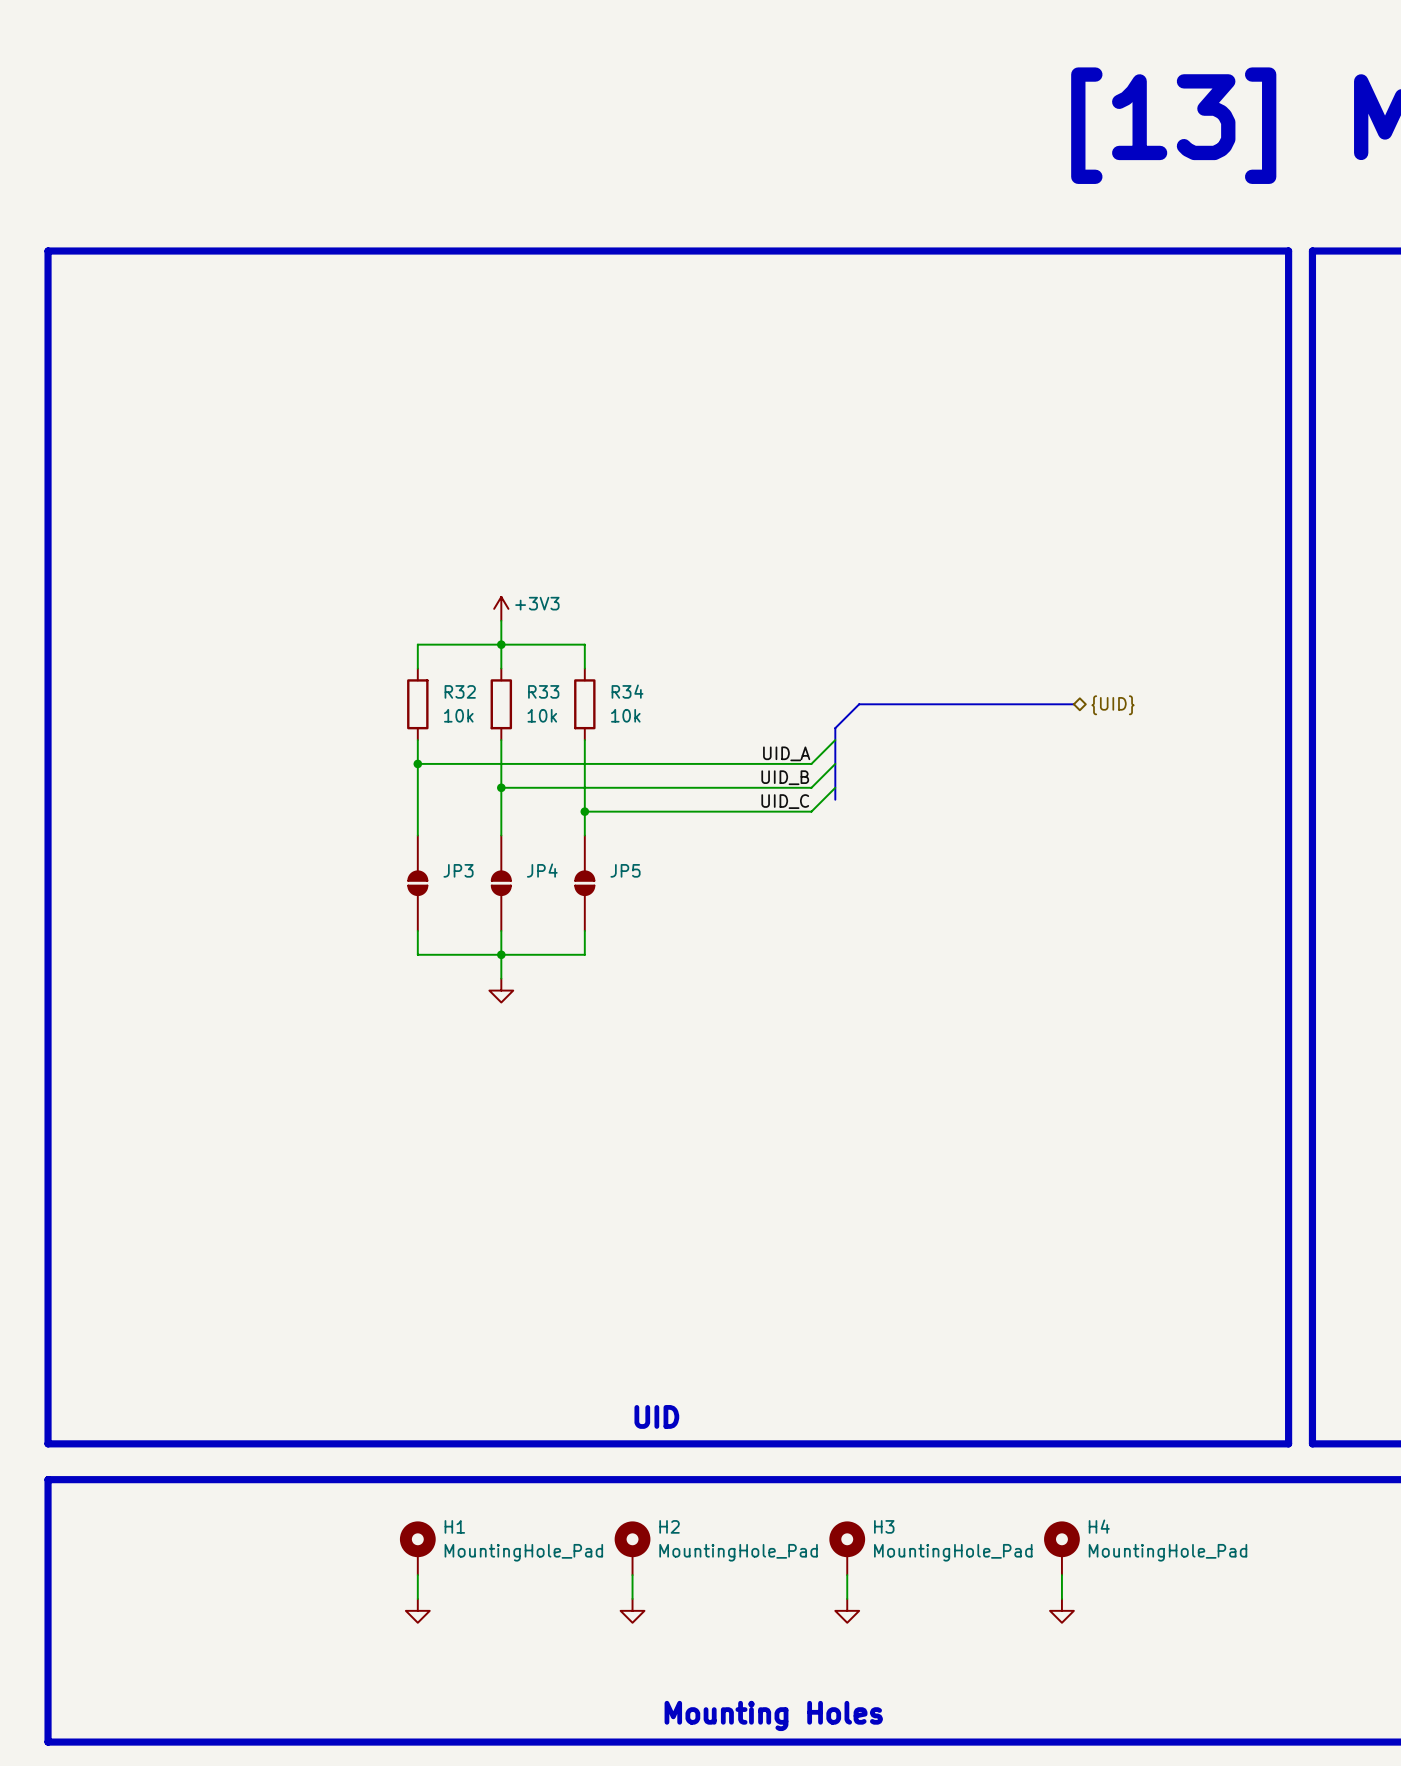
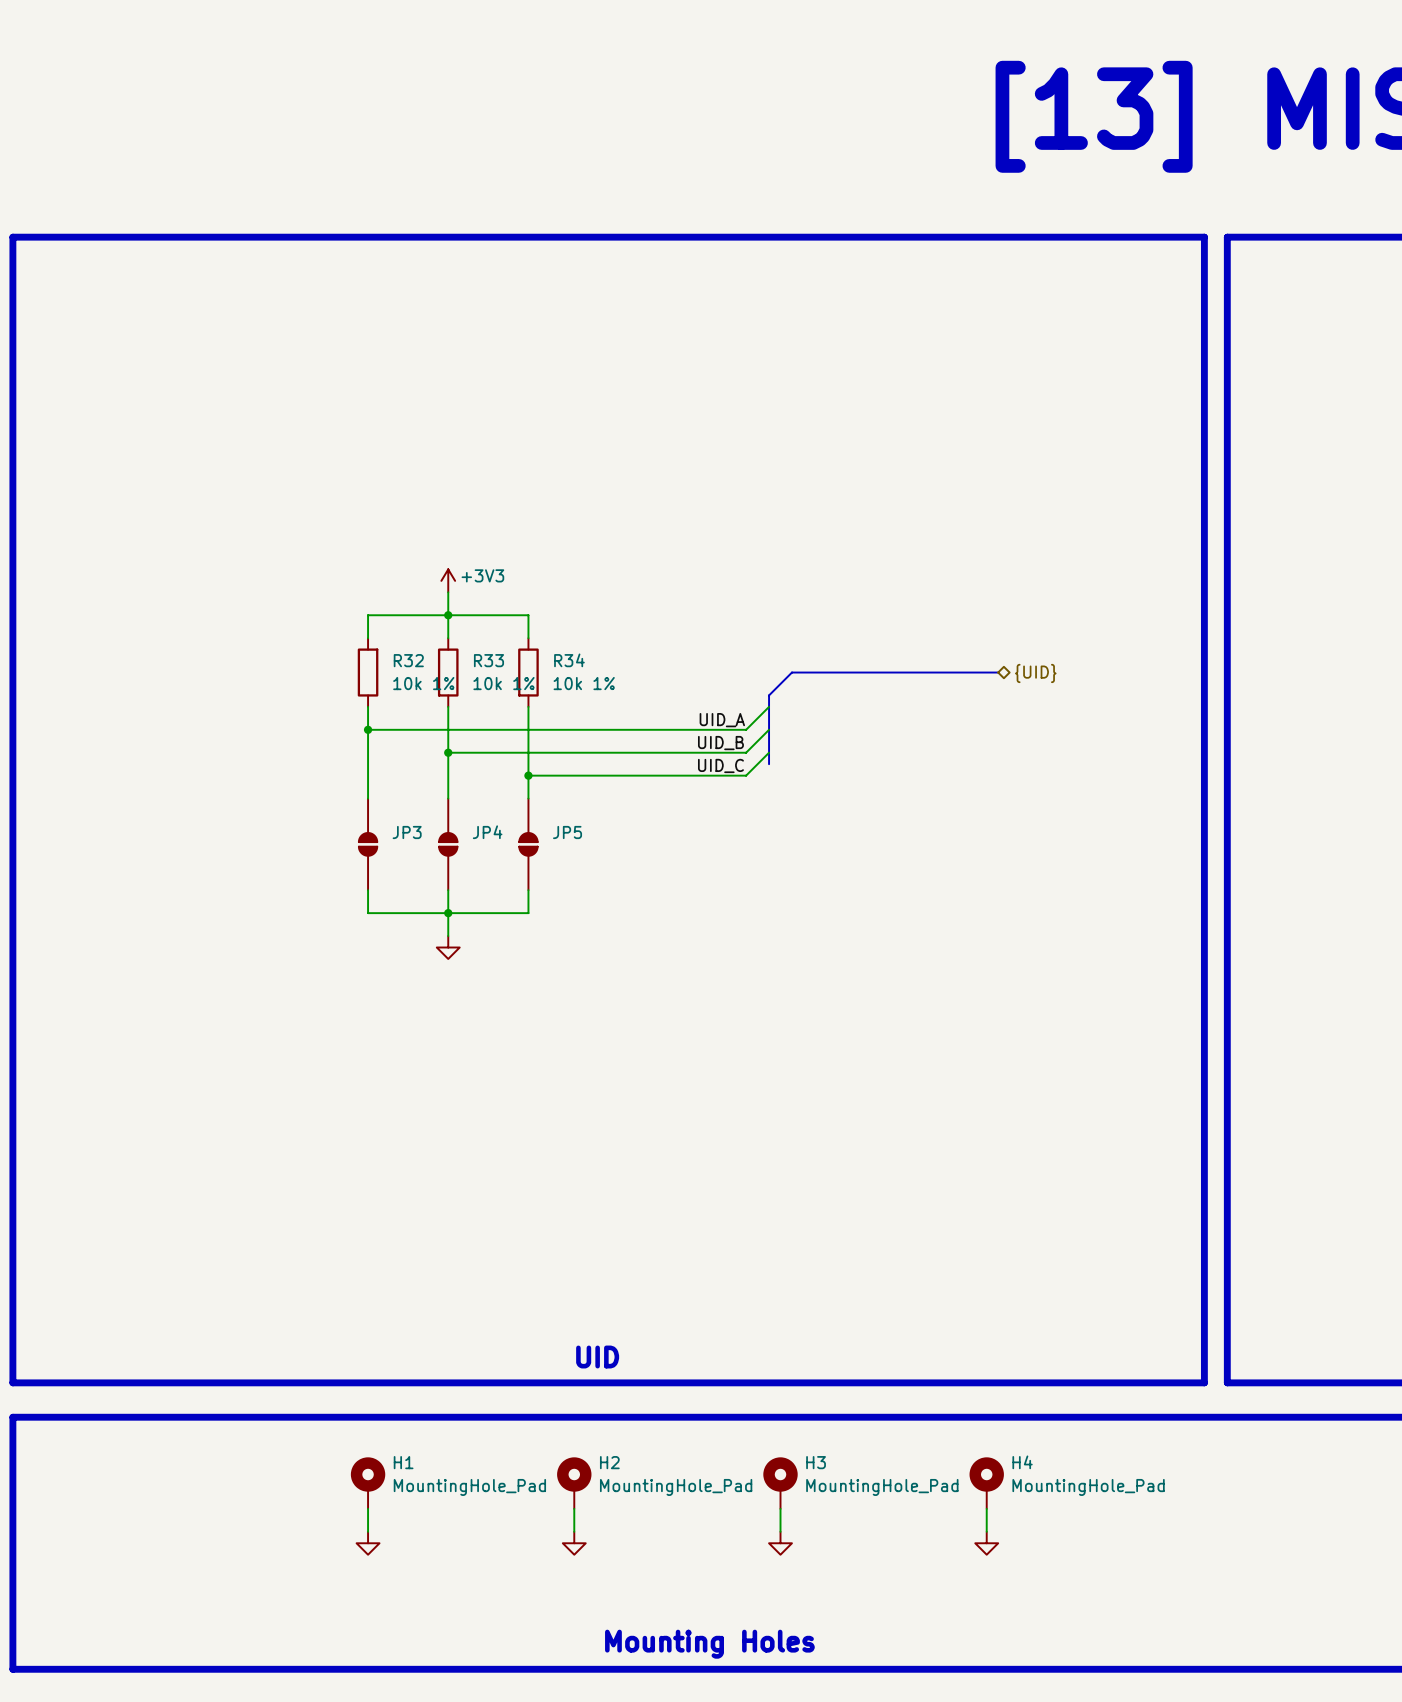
R32 value: 10k (458, 715) -> 10k 1% (423, 683)
R33 value: 10k (542, 715) -> 10k 1% (503, 683)
R34 value: 10k (625, 715) -> 10k 1% (584, 683)

